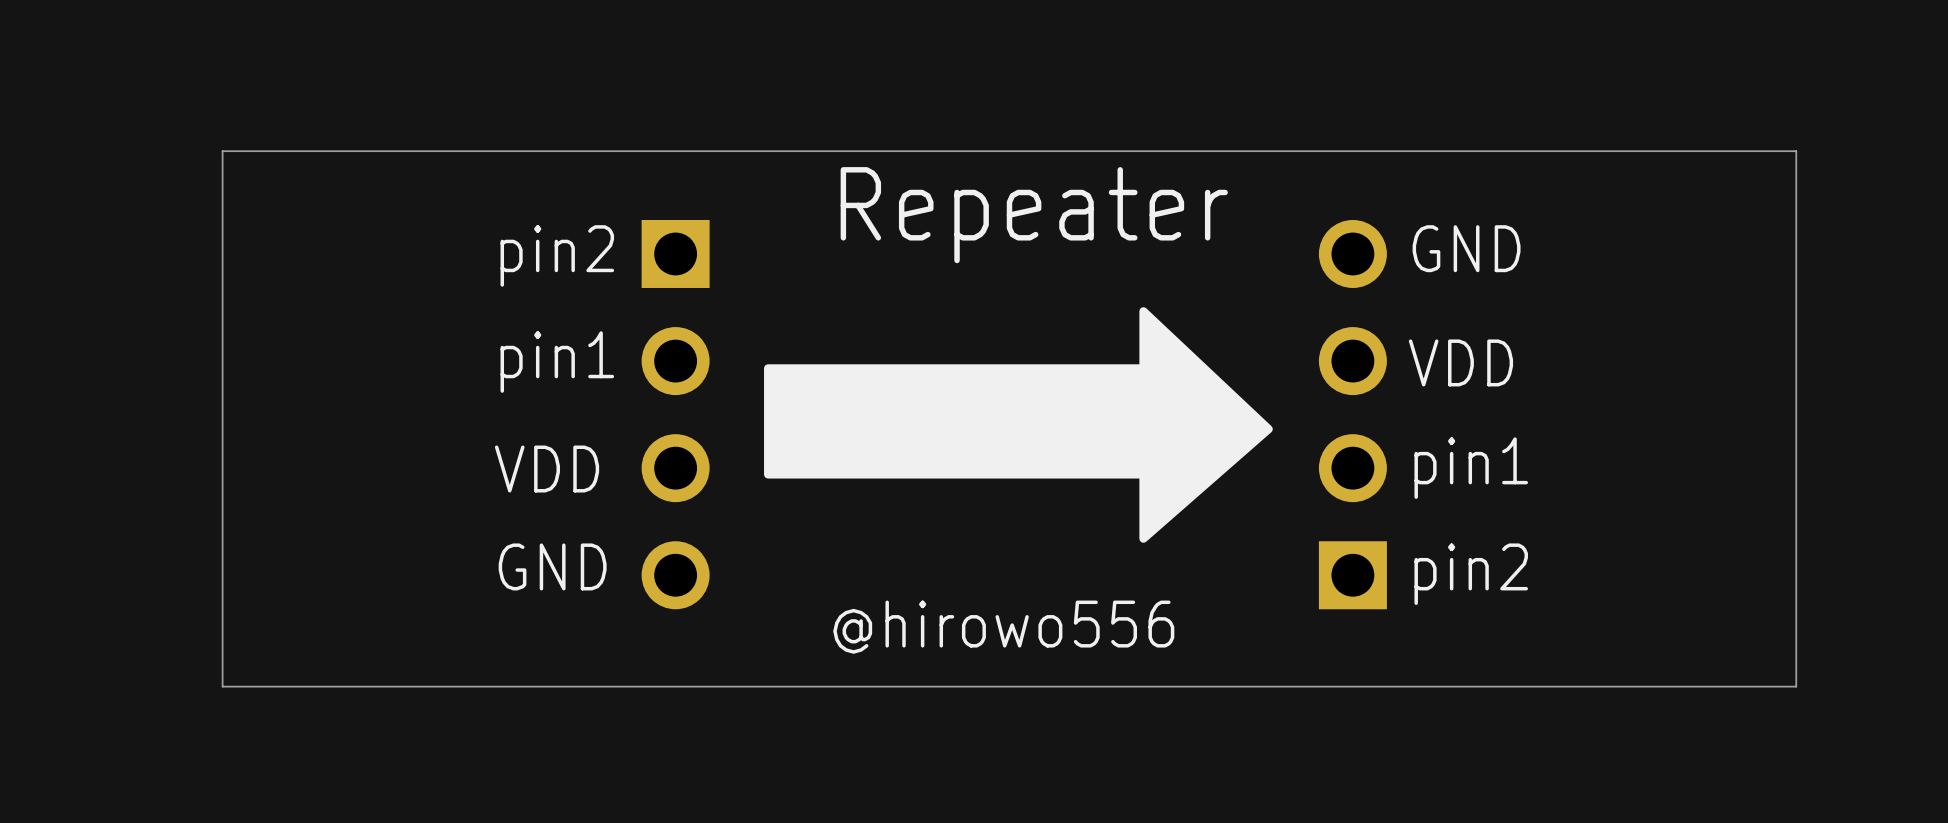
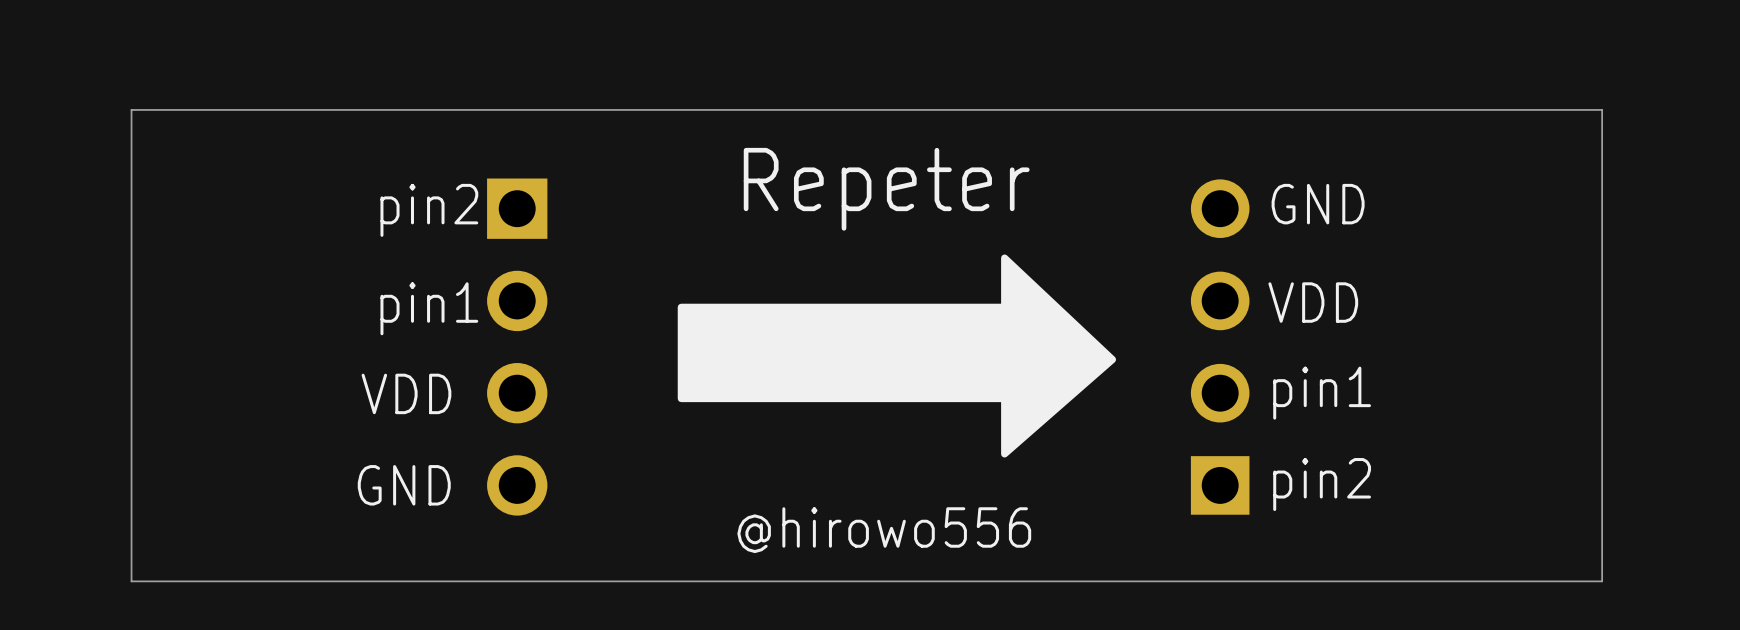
board edge: (1796, 151) (222, 151) (222, 686) -> (1602, 120) (1602, 109) (131, 109) (131, 581) (246, 581)
text: Repeater (1034, 215) -> Repeter (886, 189)
text position: pin2 (557, 255) -> pin2 (429, 210)
text position: pin1 (557, 362) -> pin1 (429, 308)
part: none -> (517, 347)
part: (675, 414) -> none
drawing position: (1018, 424) -> (896, 355)
text position: VDD (547, 469) -> VDD (406, 393)
text position: GND (552, 566) -> GND (404, 485)
text position: @hirowo556 (1003, 627) -> @hirowo556 (884, 530)

